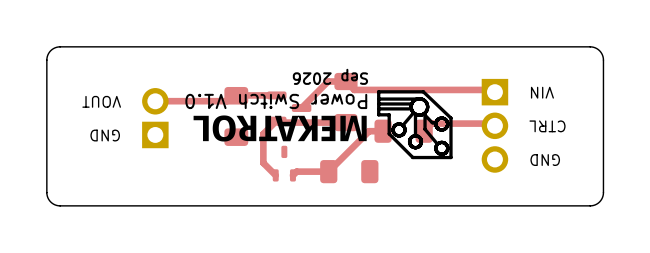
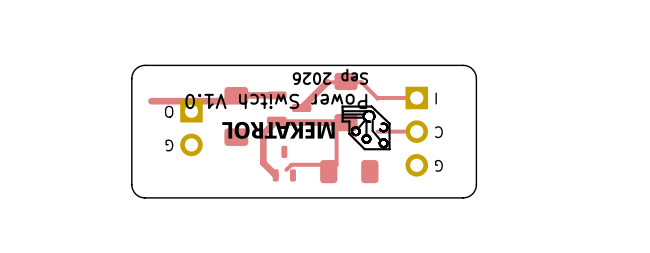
board edge: (590, 46) (56, 47) (49, 52) (46, 60) (47, 196) (52, 203) (60, 205) (593, 205) (599, 201) (603, 194) (603, 60) (599, 50) (590, 46) -> (463, 65) (472, 69) (476, 78) (476, 186) (473, 192) (468, 196) (145, 197) (138, 196) (132, 189) (131, 78) (133, 72) (140, 66) (463, 65)
top track: (327, 82) (345, 81) (354, 89) (496, 89) -> (327, 82) (361, 82) (377, 98) (416, 97)
line: (423, 91) (450, 118) (450, 157) (412, 157) (389, 133) (389, 114) (378, 114) (378, 91) (423, 91) -> none
text: VIN (542, 92) -> none
line: (420, 98) (426, 102) (427, 108) (424, 113) (418, 115) (412, 111) (411, 105) (414, 100) (420, 98) -> none
text: none -> I (436, 98)
line: (415, 99) (379, 99) -> none
text: VOUT (101, 101) -> none
line: (411, 103) (379, 103) -> none
line: none -> (371, 106) (342, 106) (342, 121) (349, 121) (349, 133) (364, 149) (389, 149) (389, 123) (371, 106)
line: (411, 108) (379, 108) -> none
text: none -> O (169, 111)
line: none -> (366, 111) (343, 111)
line: (413, 112) (402, 125) -> none
line: (425, 112) (425, 129) (436, 143) -> none
line: none -> (363, 114) (343, 114)
line: (415, 114) (415, 135) -> none
line: (424, 114) (435, 123) -> none
drawing: [193, 115, 209, 142] -> none
drawing shape: [212, 115, 236, 142] -> [222, 122, 233, 139]
drawing shape: [236, 115, 257, 142] -> [234, 121, 250, 139]
drawing shape: [259, 115, 278, 142] -> [264, 122, 277, 139]
drawing shape: [274, 115, 299, 142] -> [275, 122, 291, 139]
drawing shape: [297, 115, 318, 142] -> [305, 122, 315, 139]
drawing shape: [321, 115, 336, 142] -> [317, 122, 335, 139]
drawing: [340, 115, 367, 142] -> none
line: none -> (363, 115) (363, 117)
line: none -> (374, 115) (374, 117)
line: none -> (363, 117) (343, 117)
part: (155, 118) -> none
line: (442, 118) (446, 120) (447, 124) (445, 128) (440, 129) (437, 127) (435, 123) (438, 119) (442, 118) -> none
part footprint: [374, 119, 433, 143] -> [405, 86, 429, 177]
line: none -> (365, 120) (358, 128)
line: none -> (372, 120) (372, 130) (380, 140)
line: none -> (366, 121) (366, 135)
line: none -> (370, 121) (367, 121)
drawing: none -> [250, 122, 264, 139]
drawing: none -> [290, 122, 303, 139]
top track: (496, 123) (431, 123) (424, 131) -> none
line: (402, 125) (398, 124) (394, 126) (393, 130) (395, 134) (399, 135) (403, 133) (404, 129) (402, 125) -> none
part: (494, 125) -> none
text: CTRL (547, 126) -> none
part: none -> (191, 128)
top track: none -> (336, 131) (336, 164) (291, 164) (286, 169)
top track: (383, 131) (369, 131) (328, 171) (296, 171) (292, 175) -> none
top track: none -> (416, 131) (377, 131)
text: none -> C (438, 132)
text: GND (105, 135) -> none
line: (415, 135) (419, 137) (421, 141) (419, 145) (415, 147) (411, 145) (409, 141) (411, 137) (415, 135) -> none
line: (442, 142) (446, 144) (447, 148) (445, 152) (441, 154) (437, 152) (435, 148) (437, 143) (442, 142) -> none
text: none -> G (169, 145)
text: GND (545, 160) -> none
text: none -> G (438, 165)

